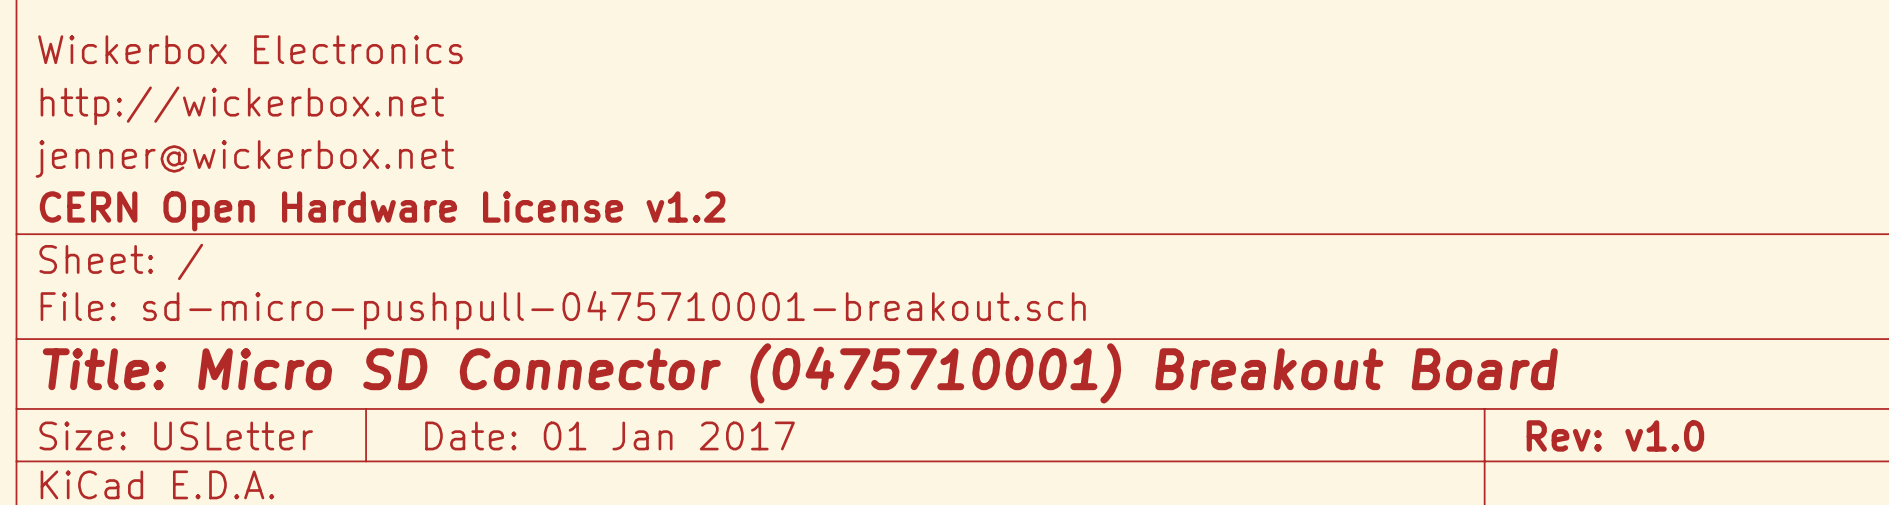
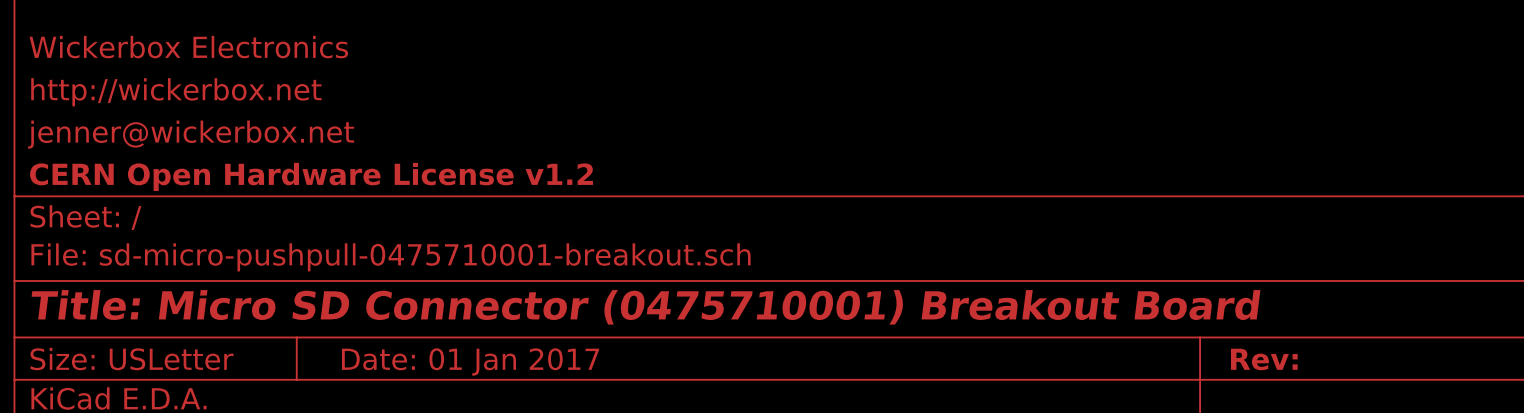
title block: Rev: v1.0 (1615, 435) -> Rev: (1264, 359)

